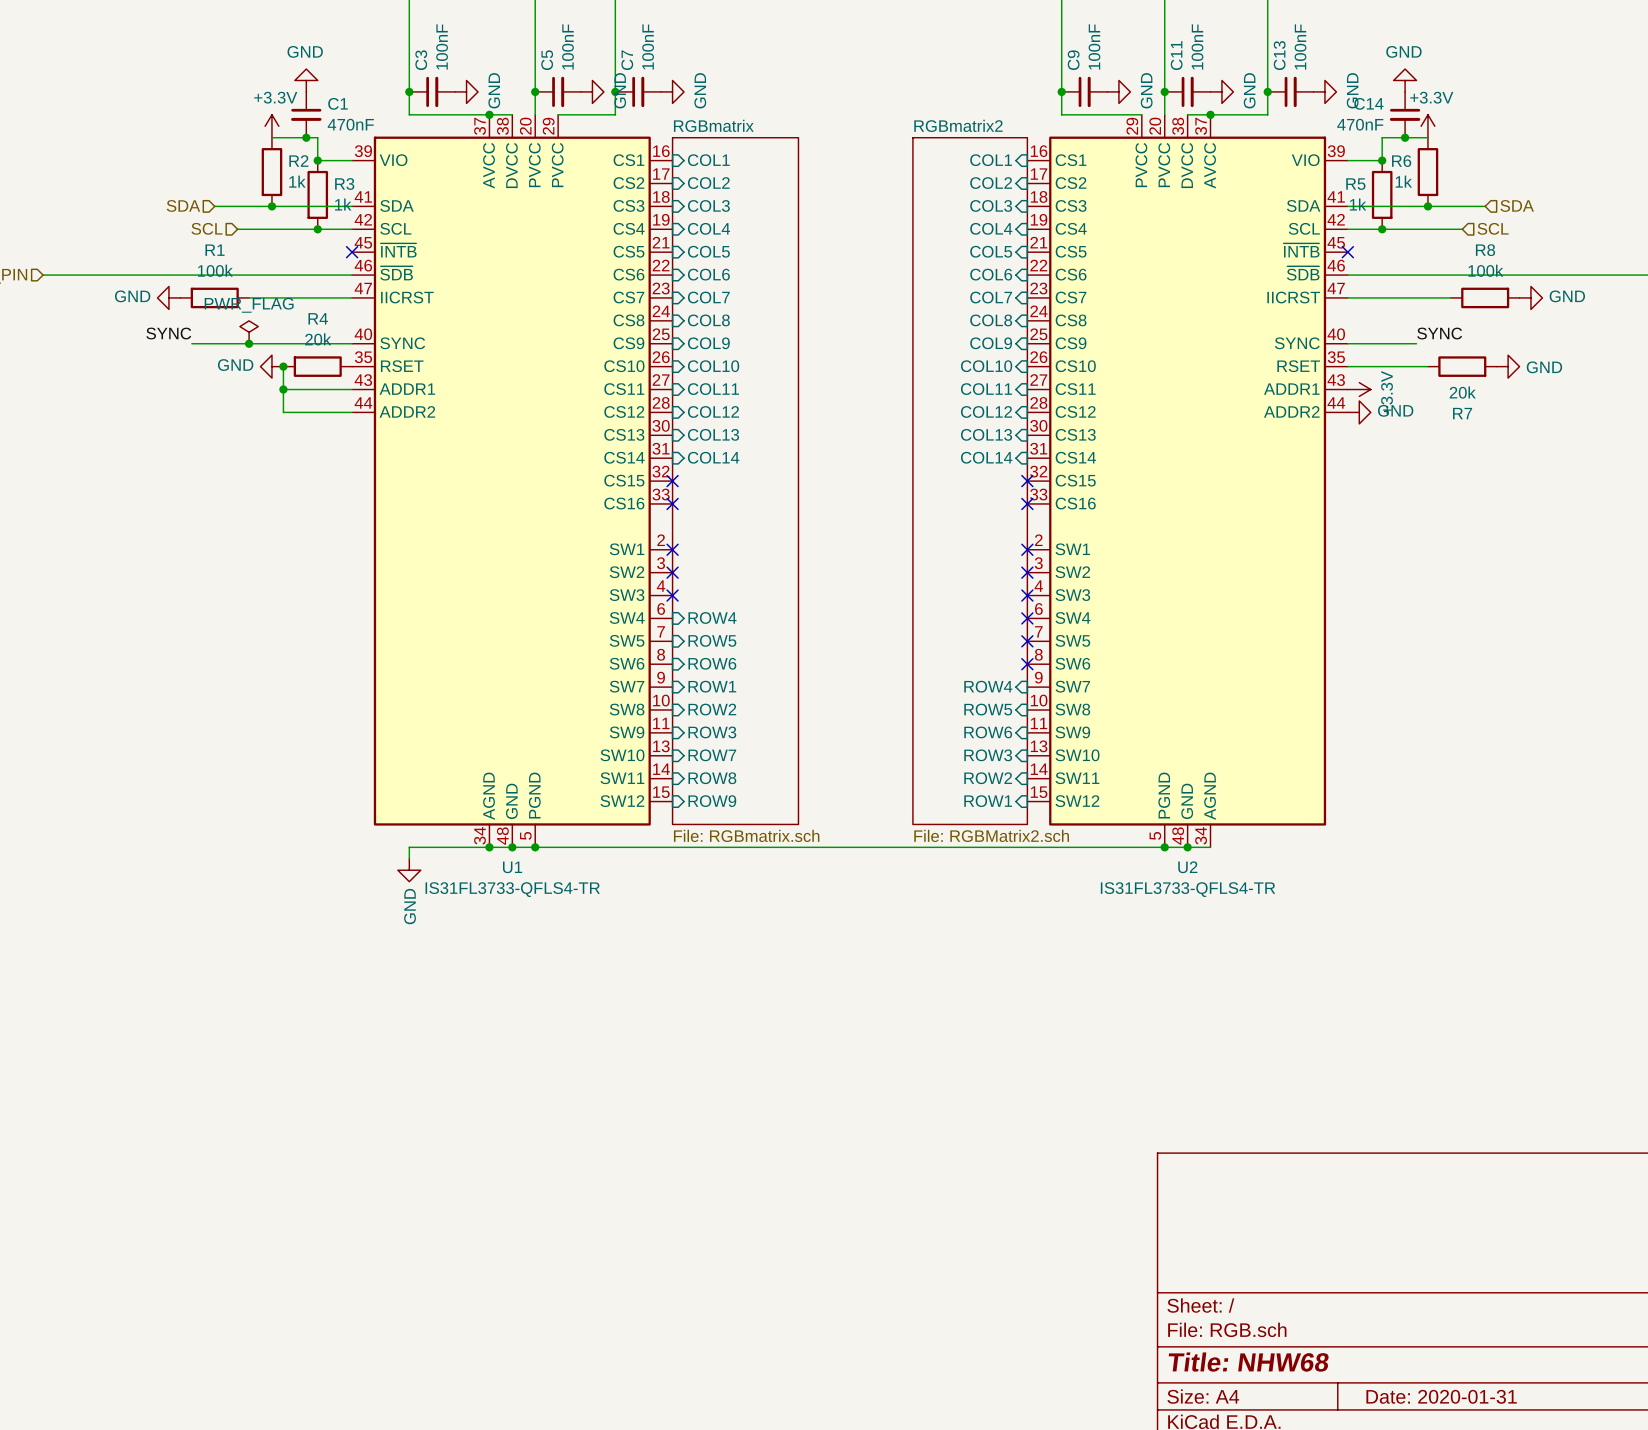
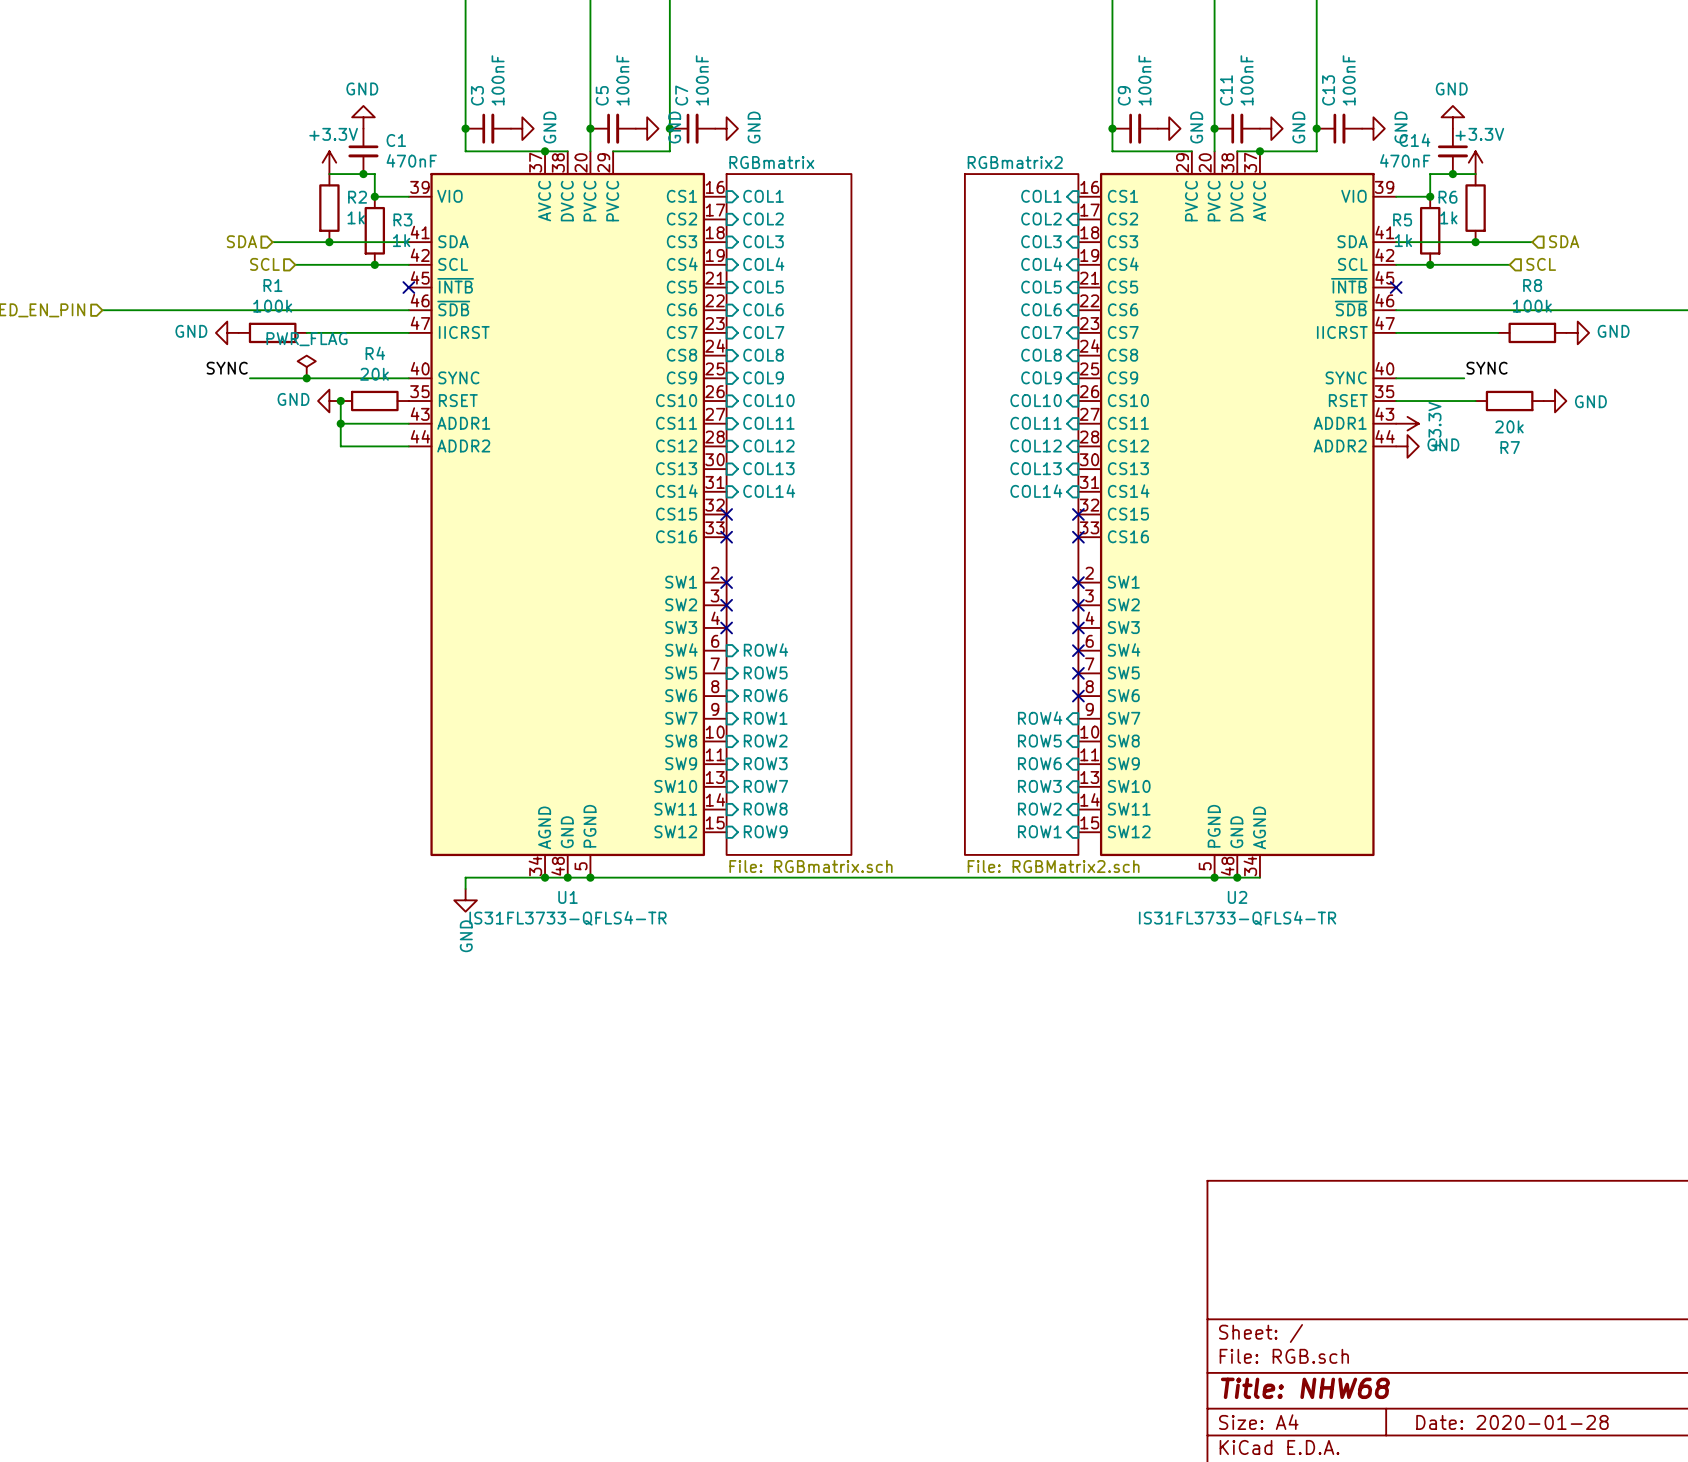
title block: Date: 2020-01-31 (1441, 1396) -> Date: 2020-01-28 (1512, 1422)

